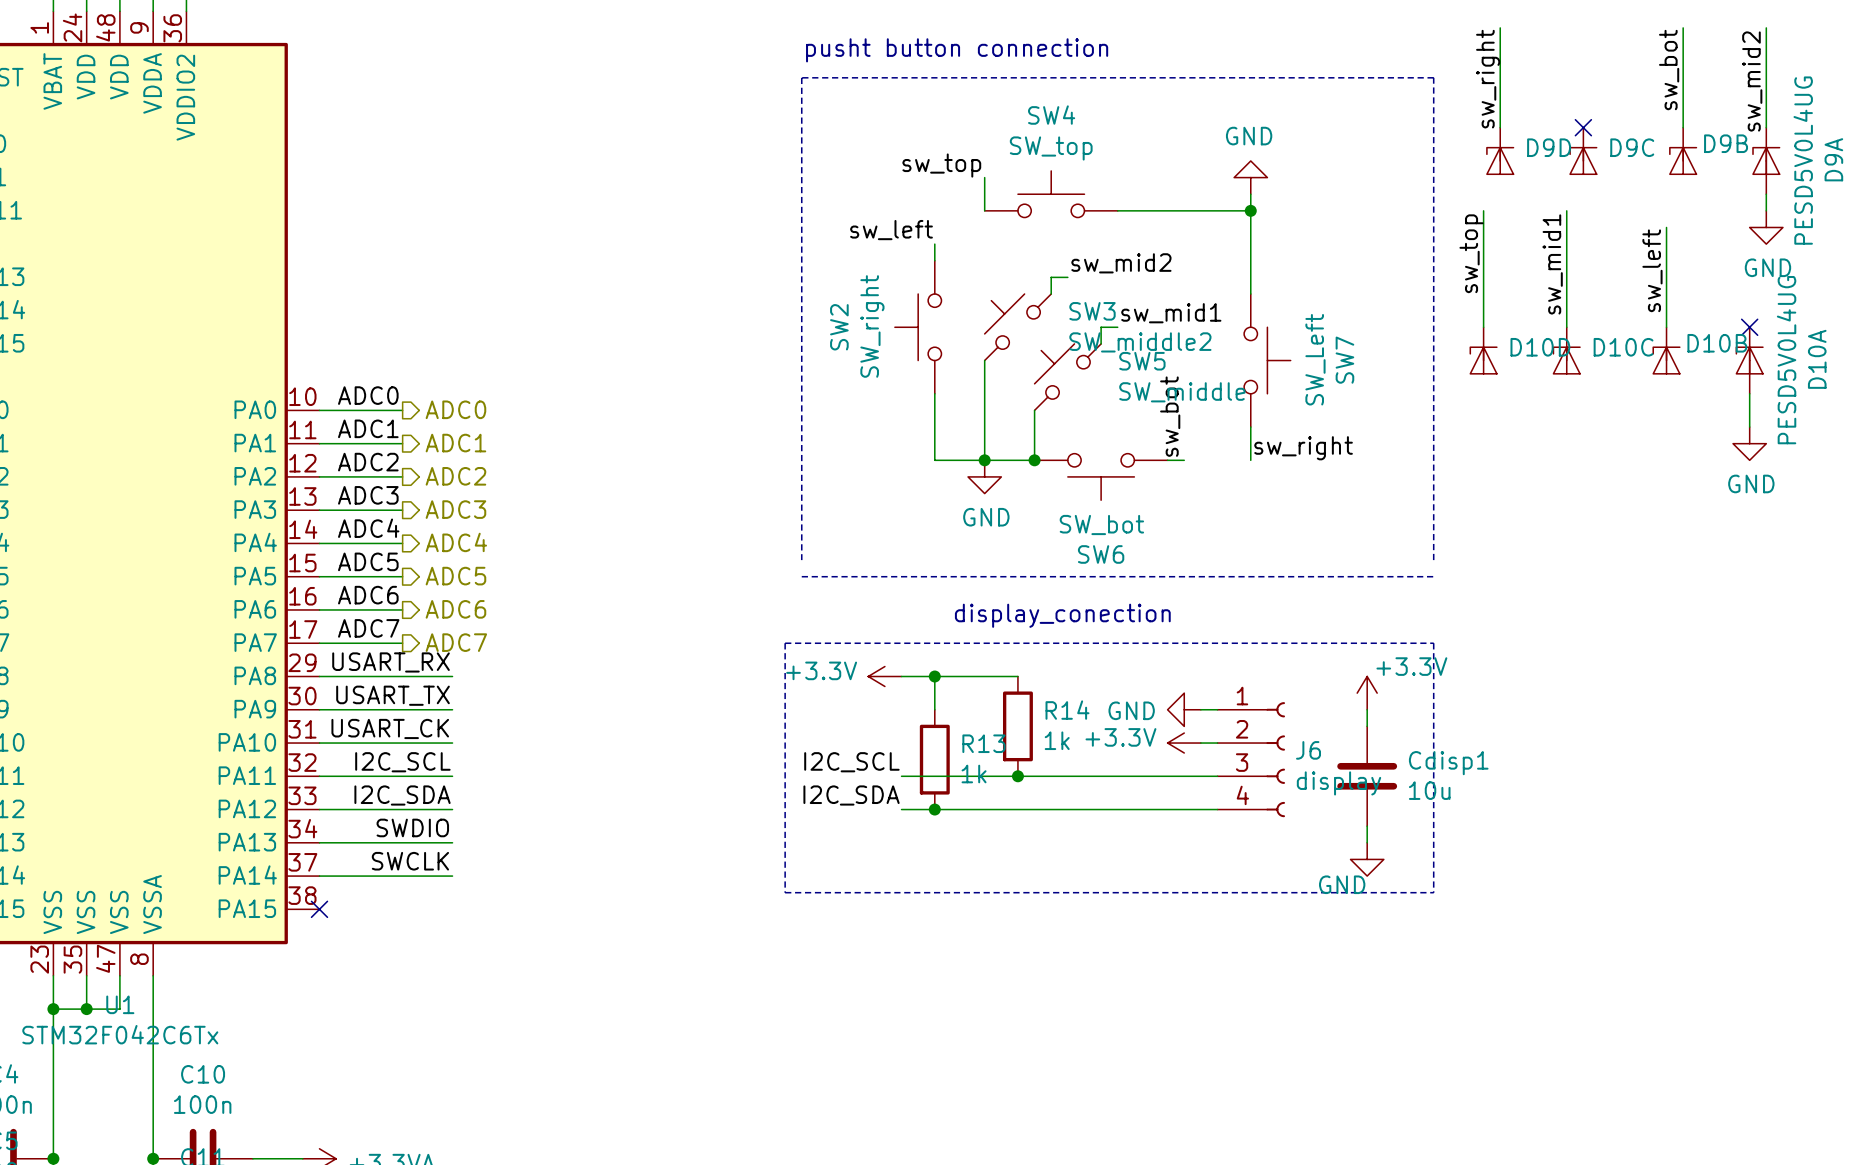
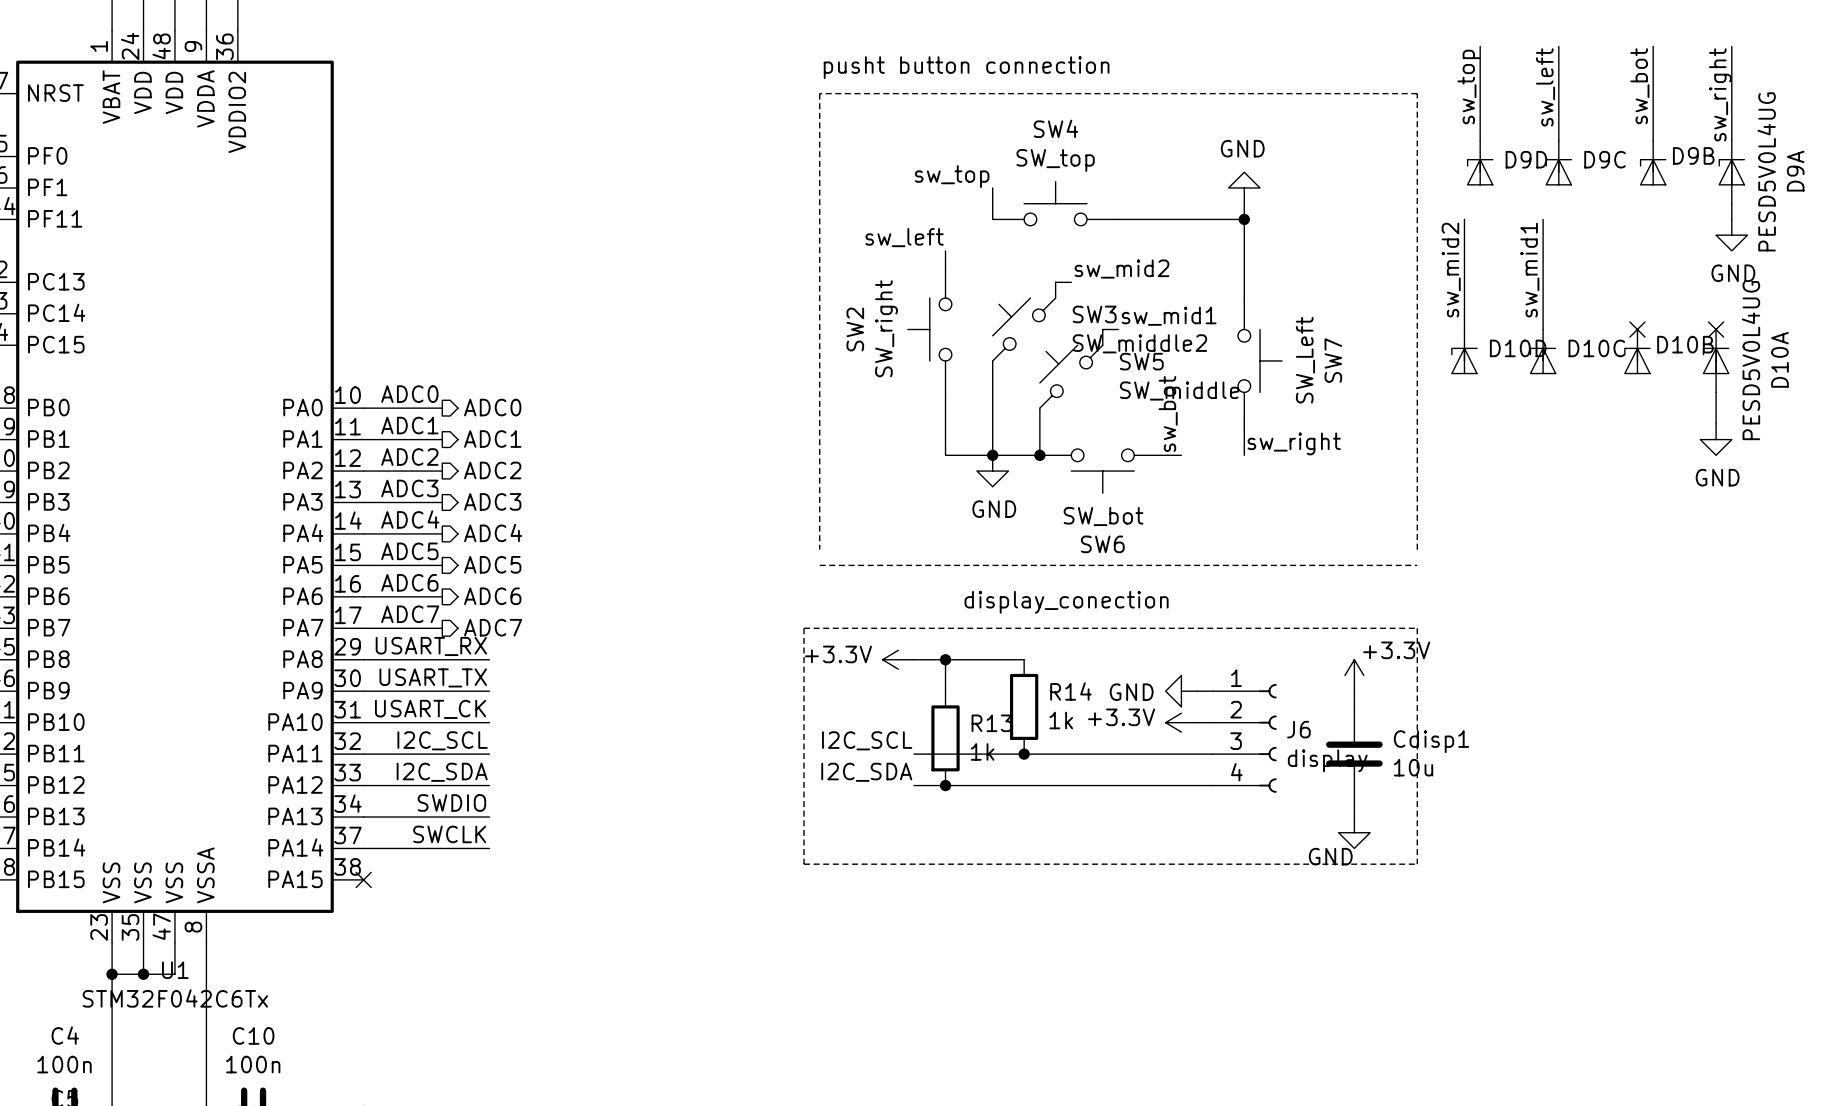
label: sw_right (1488, 79) -> sw_top (1468, 87)
label: sw_mid2 (1752, 81) -> sw_right (1720, 94)
no-connect mark: (1583, 127) -> none
wire: (1666, 227) (1666, 327) -> (1558, 46) (1558, 140)
label: sw_top (1471, 253) -> sw_mid2 (1451, 270)
label position: sw_left (1652, 270) -> sw_left (1545, 87)
no-connect mark: none -> (1637, 329)

